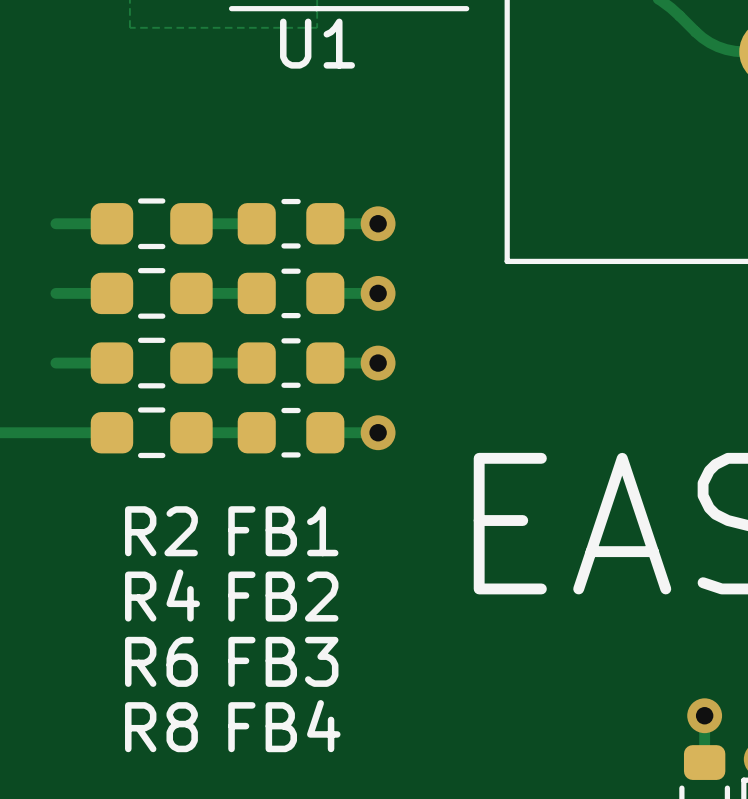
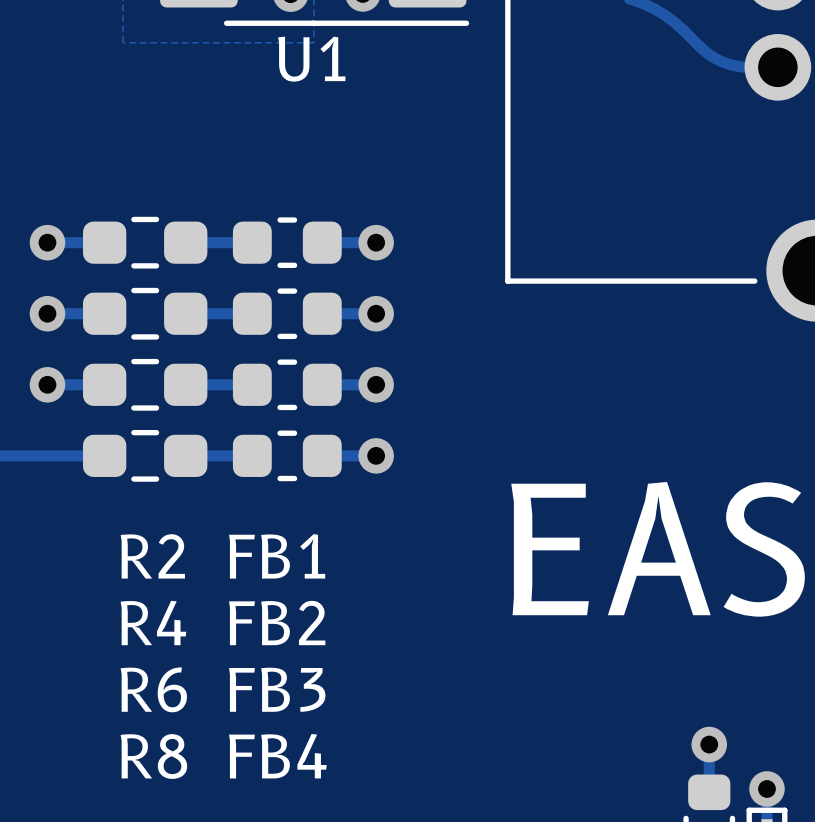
via: none -> (47, 242)
via: none -> (47, 313)
via: none -> (47, 384)

